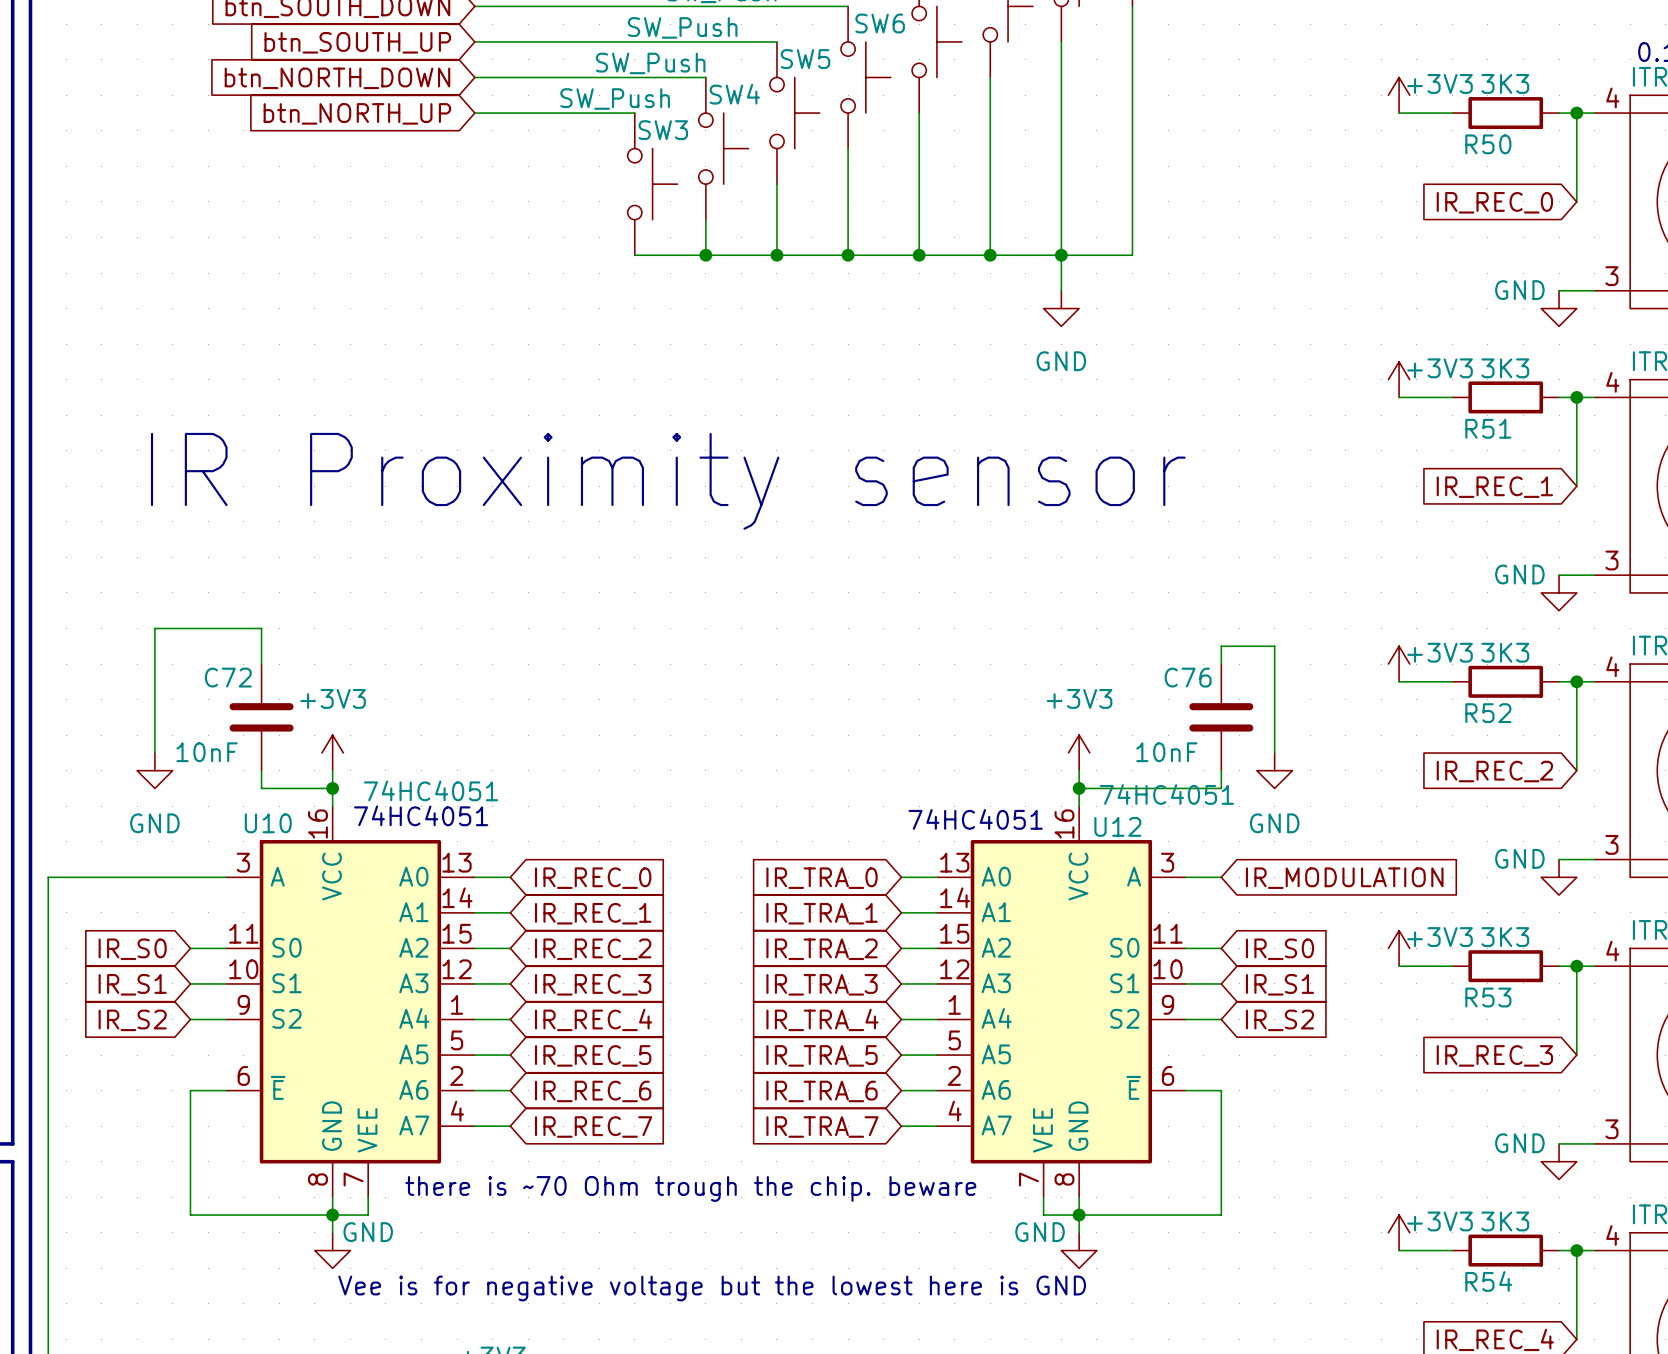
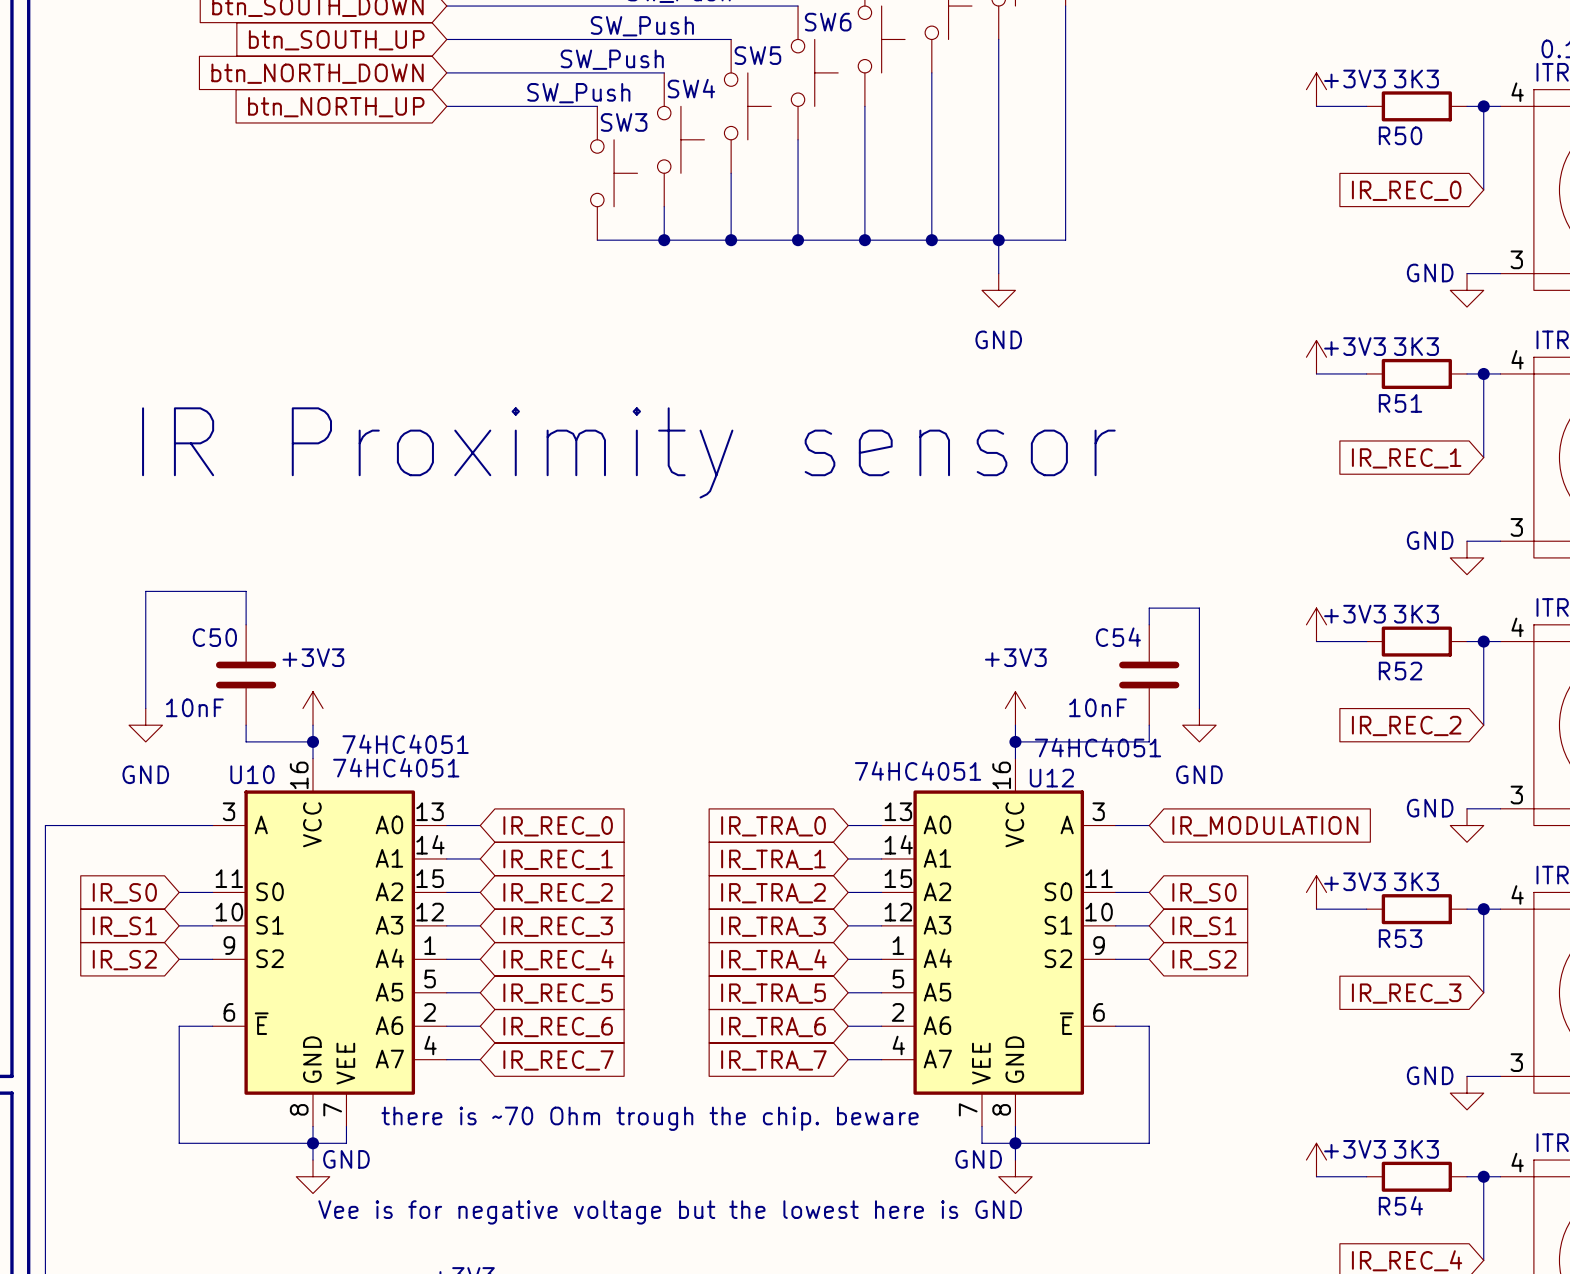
C72 name: C72 (228, 677) -> C50 (214, 637)
C76 name: C76 (1188, 677) -> C54 (1118, 637)

